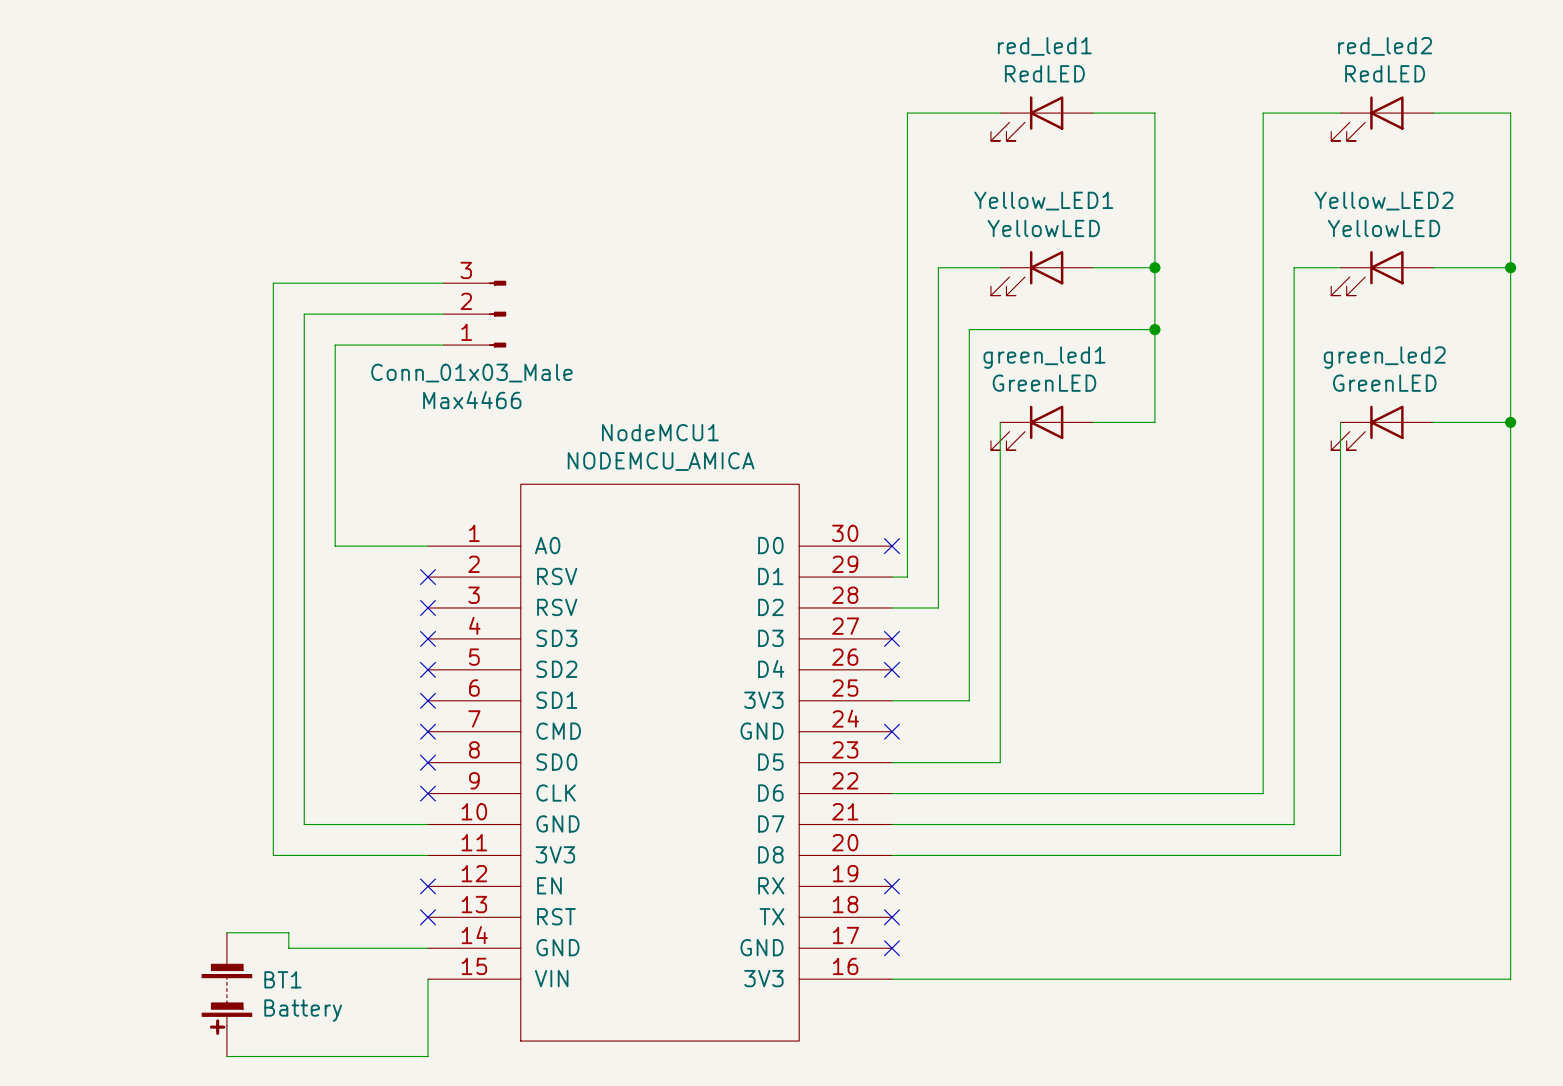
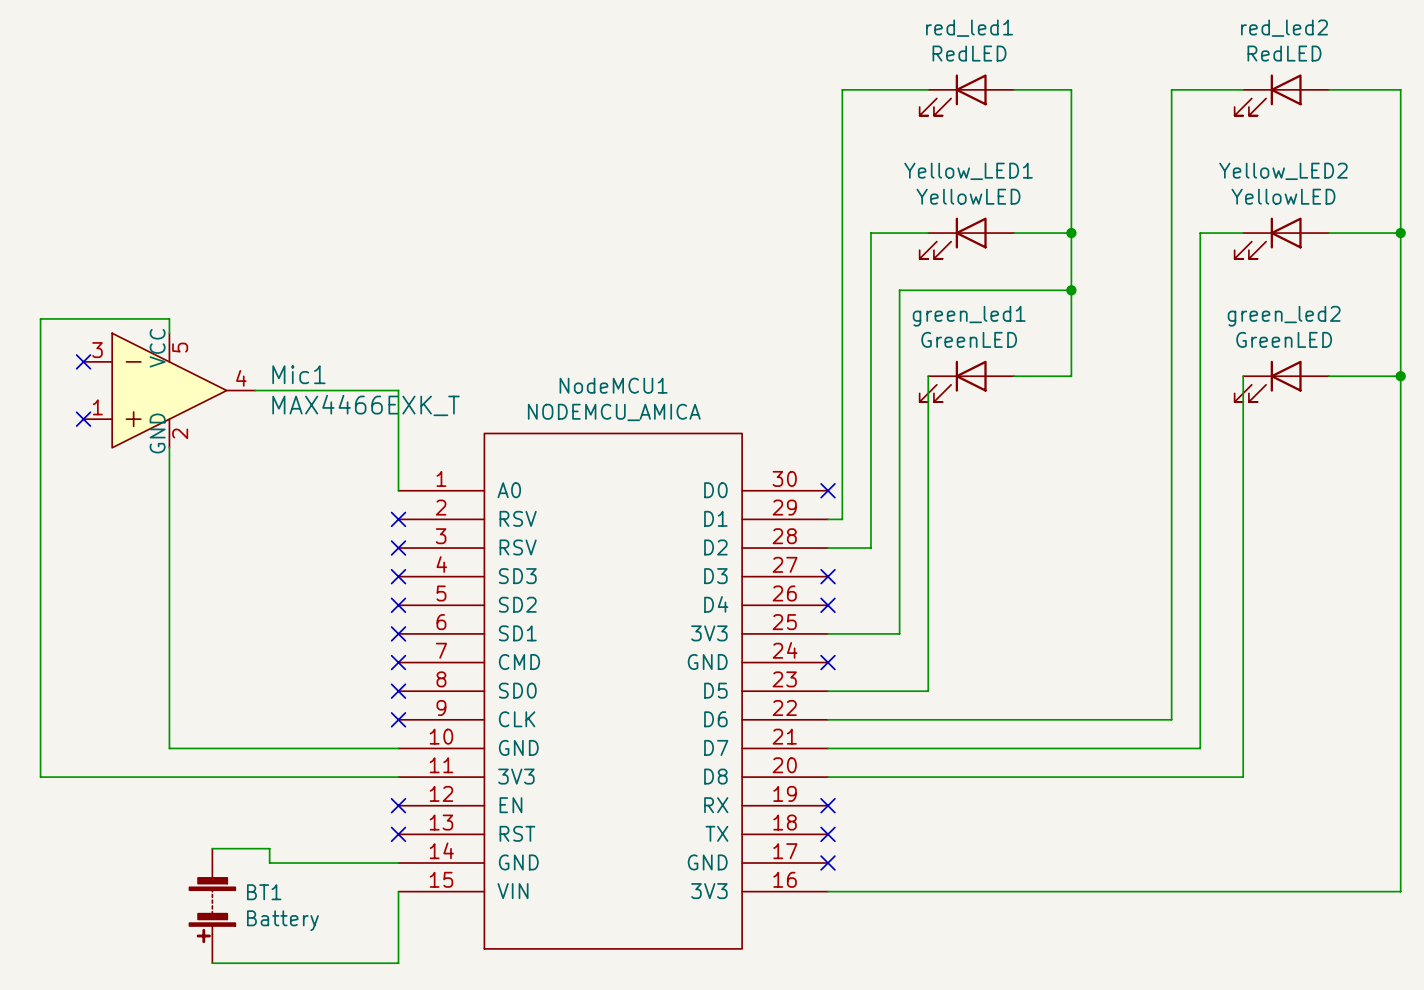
wire: (443, 283) (273, 283) (273, 855) -> (169, 333) (169, 318) (40, 318) (40, 777) (255, 777)
wire: (443, 314) (304, 314) (304, 824) -> (169, 447) (169, 748) (283, 748)
Max4466: Conn_01x03_Male (474, 314) -> none
wire: (443, 345) (335, 345) (335, 546) (427, 546) -> (255, 390) (398, 390) (398, 490)
no-connect mark: none -> (83, 361)
Mic1: none -> MAX4466EXK_T (169, 390)
no-connect mark: none -> (83, 419)

